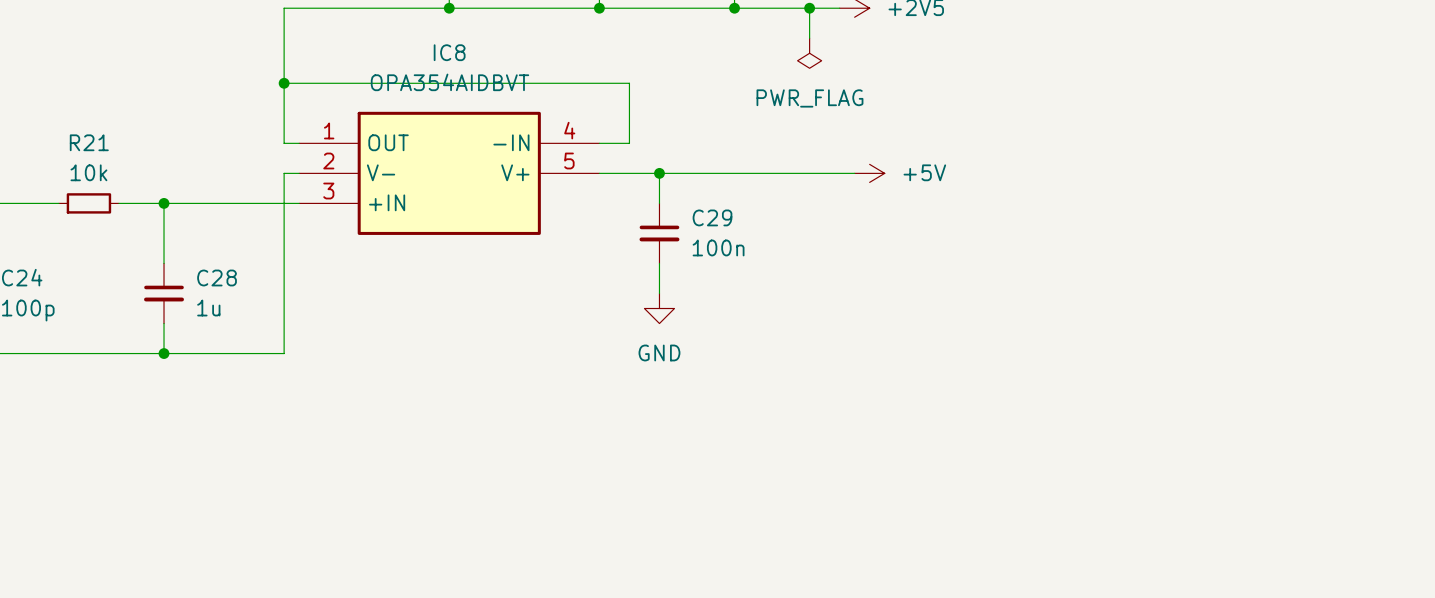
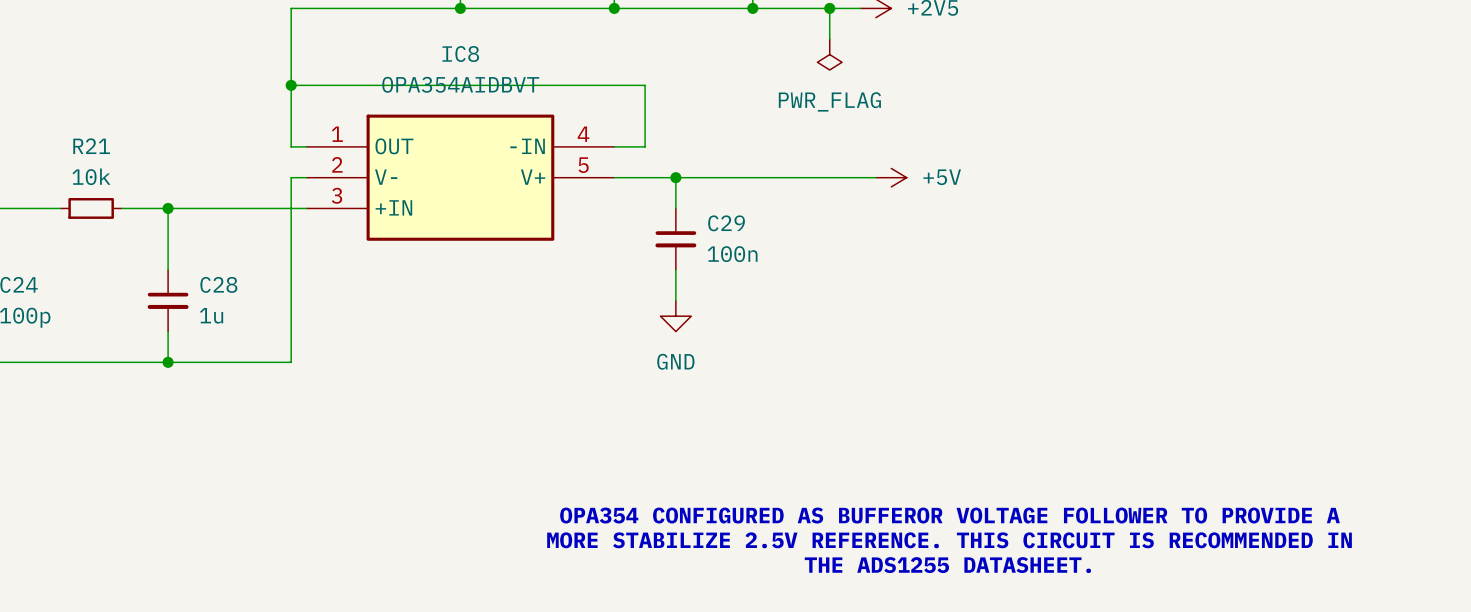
text: none -> OPA354 CONFIGURED AS BUFFEROR VOLTAGE FOLLOWER TO PROVIDE A (950, 515)
text: none -> MORE STABILIZE 2.5V REFERENCE. THIS CIRCUIT IS RECOMMENDED IN (949, 540)
text: none -> THE ADS1255 DATASHEET. (947, 565)

